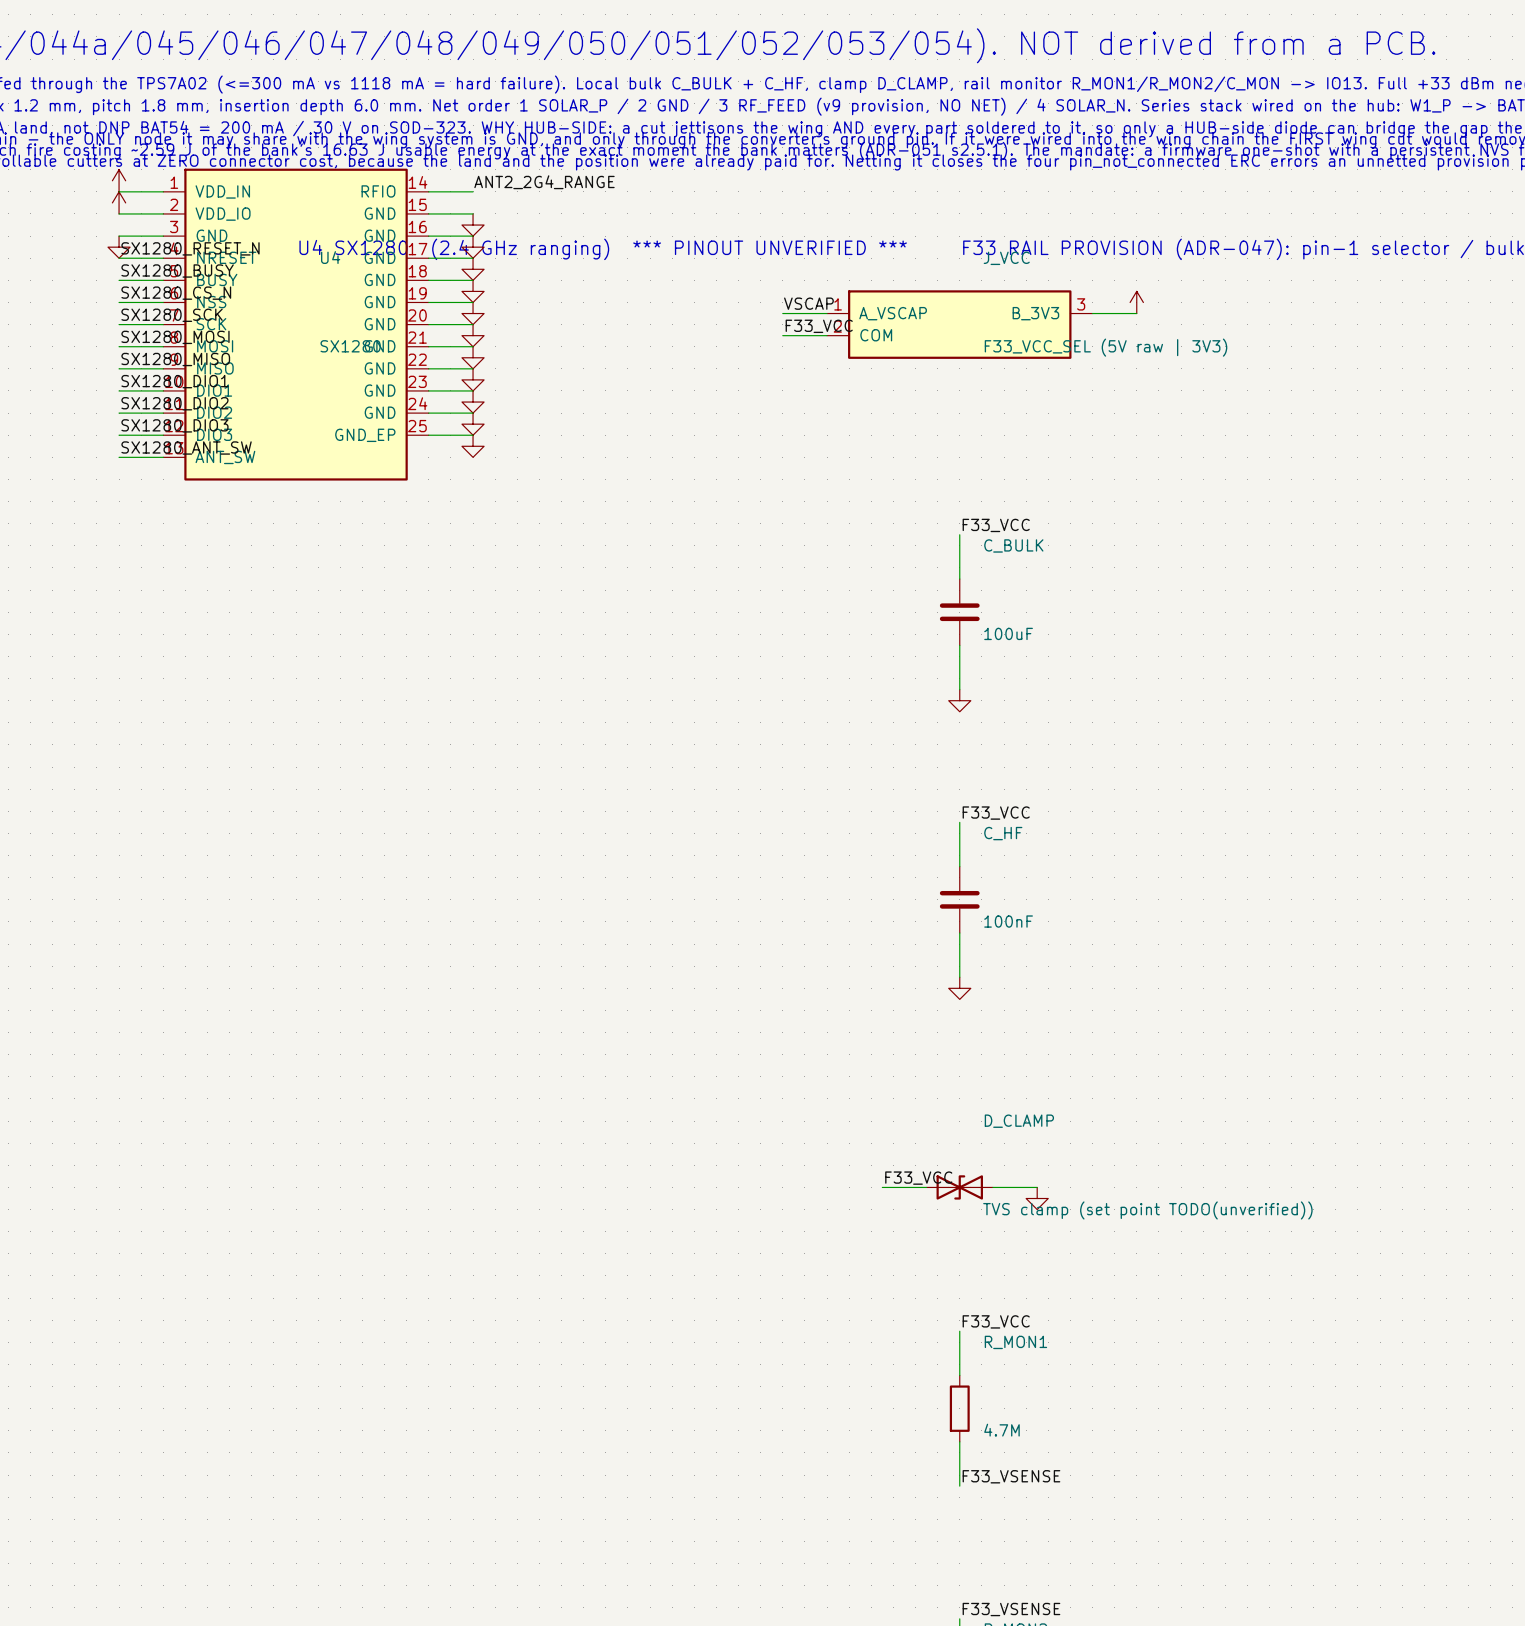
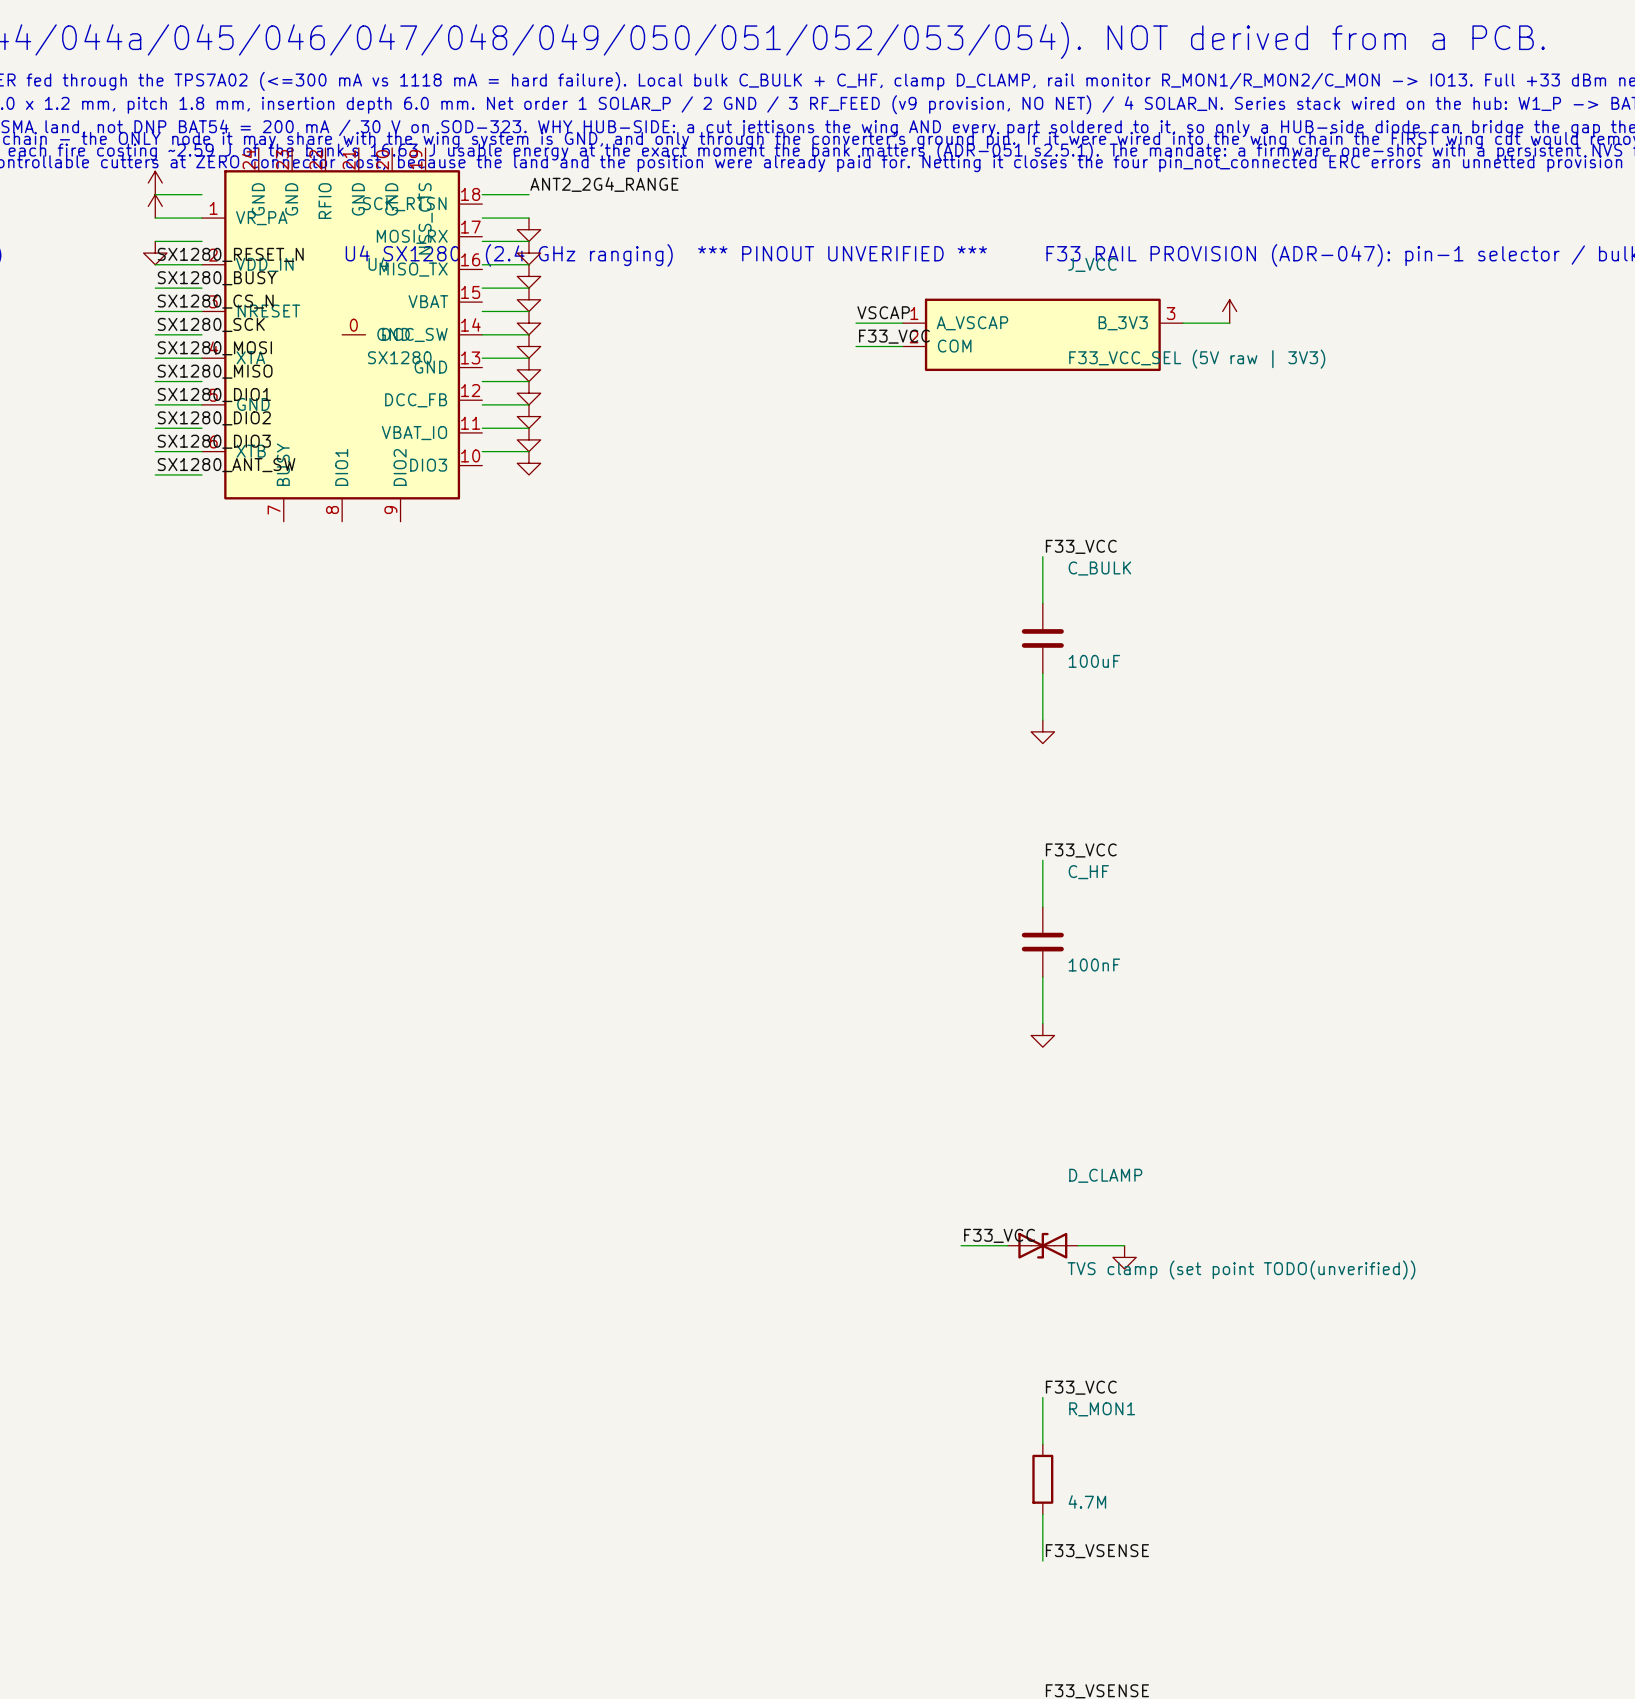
U4 symbol: [163, 168, 429, 481] -> [202, 147, 483, 522]

